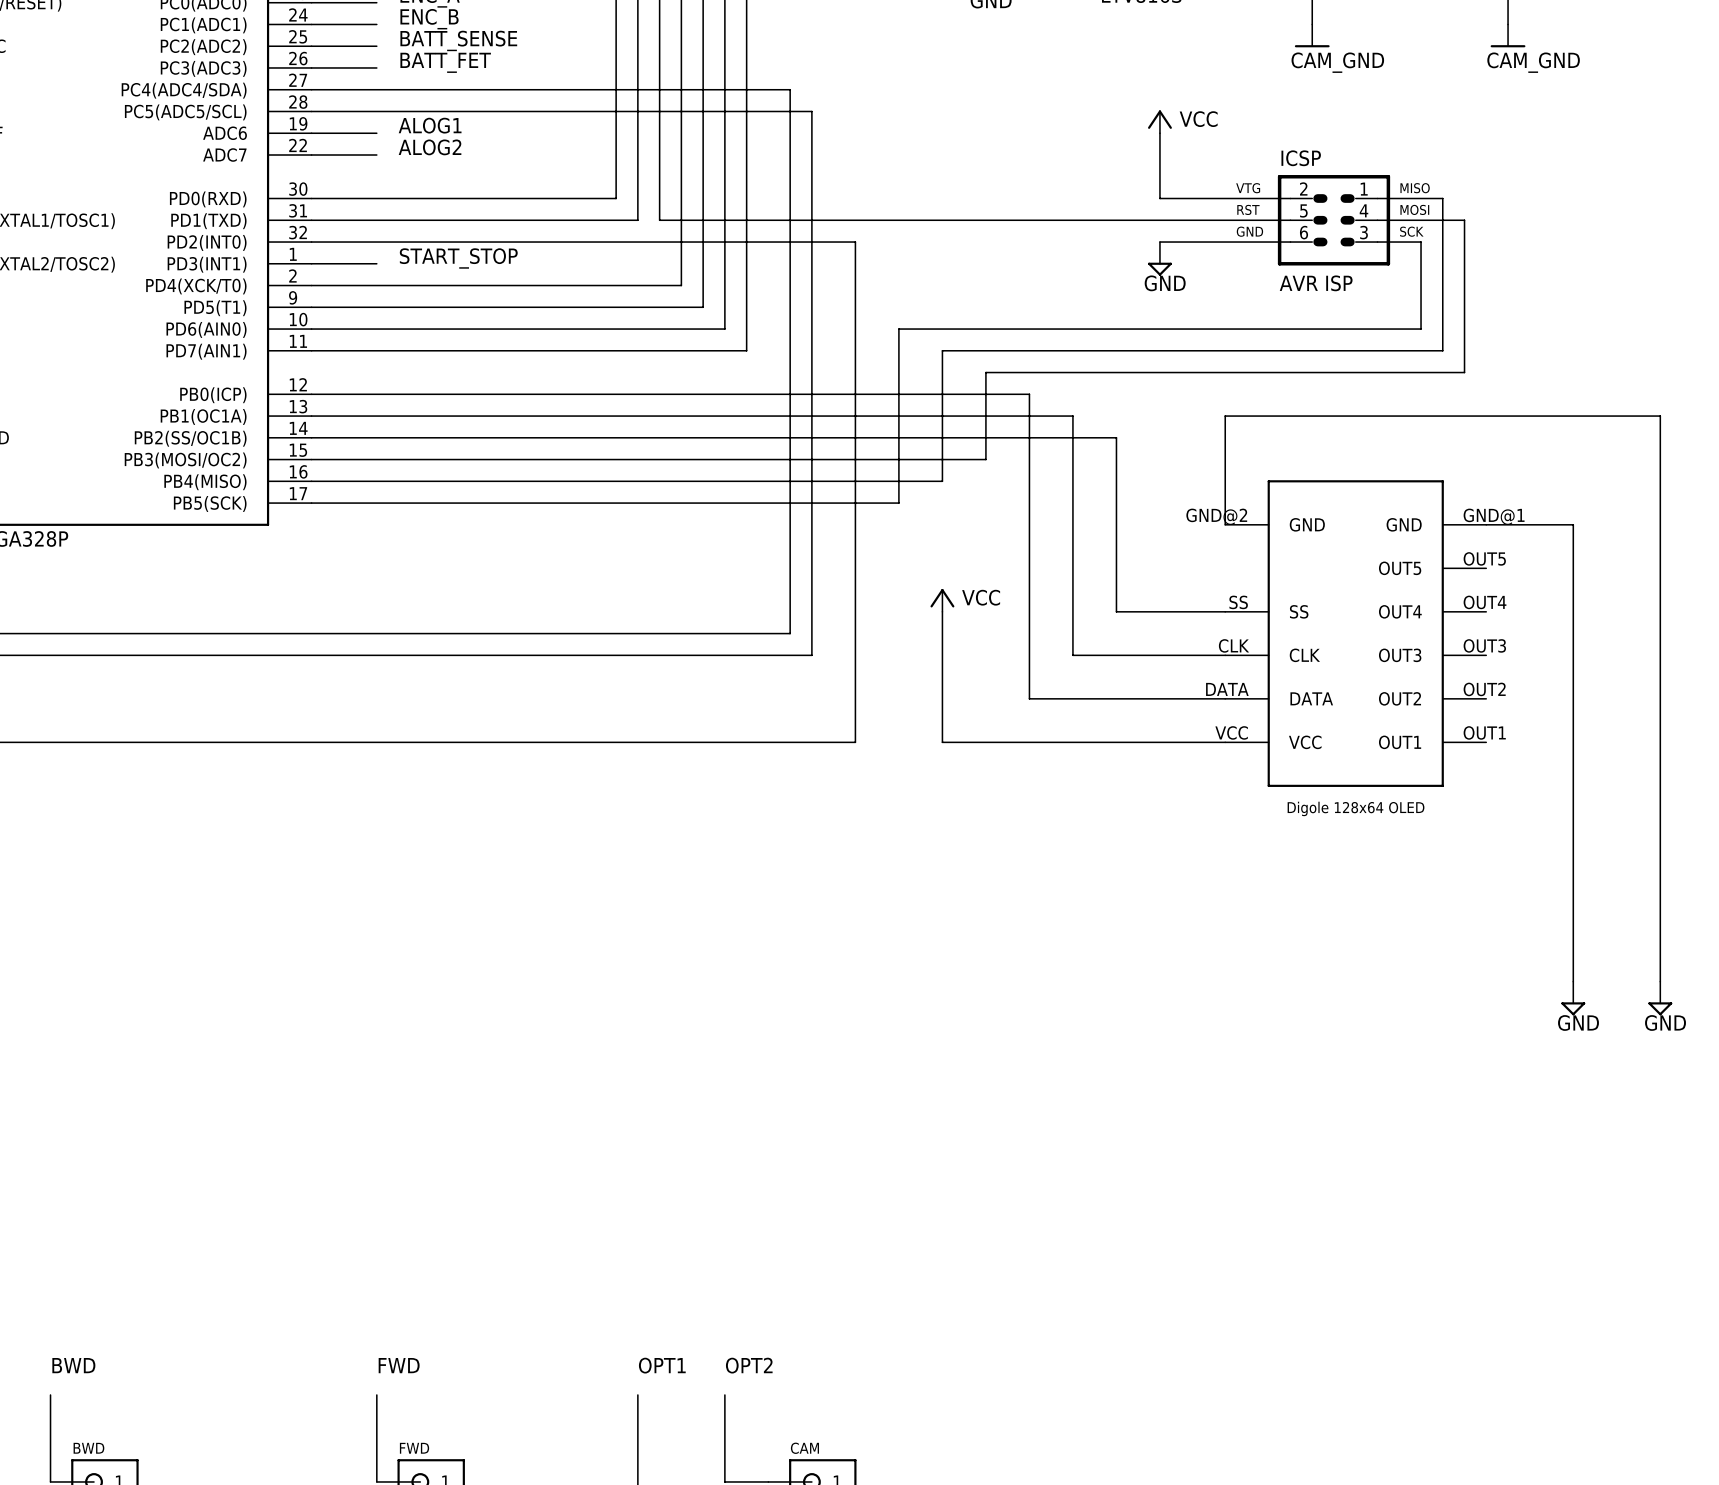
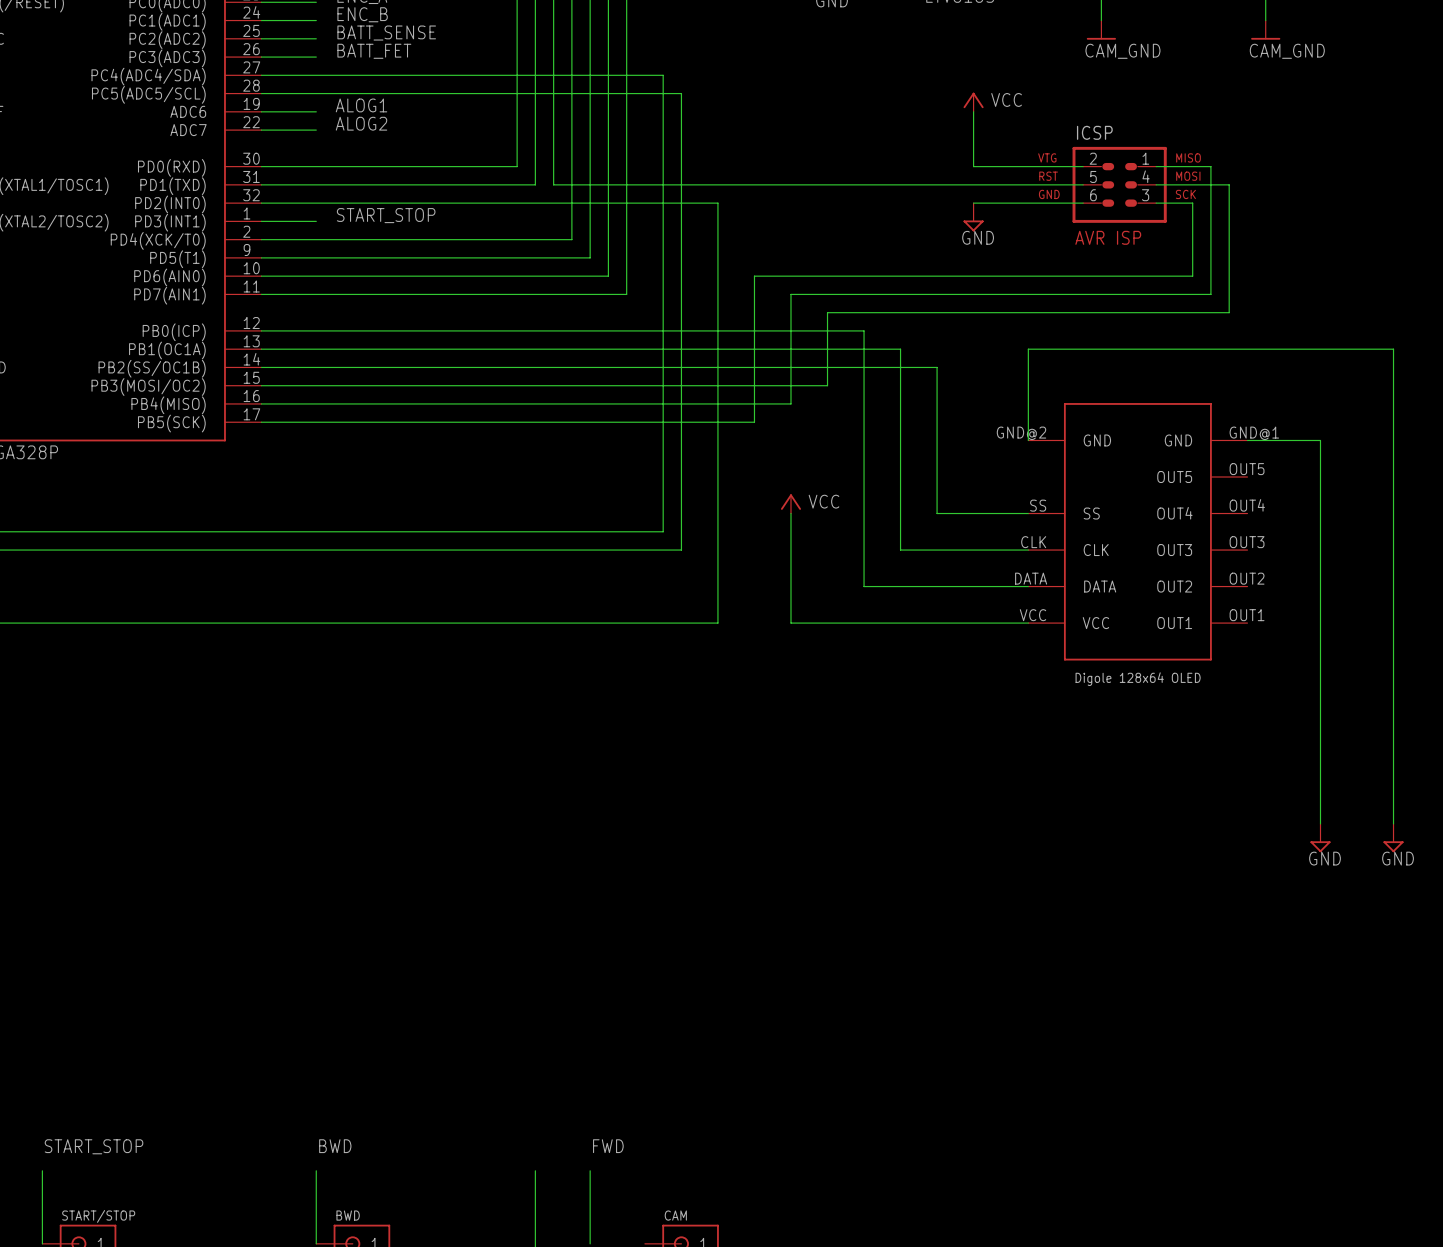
label: BWD (73, 1365) -> START_STOP (94, 1146)
label: FWD (399, 1365) -> BWD (335, 1146)
label: OPT1 (662, 1365) -> none
label: none -> FWD (608, 1146)
label: OPT2 (749, 1365) -> none
wire: none -> (590, 1170) (590, 1243)
wire: (724, 1394) (724, 1481) (768, 1481) -> none
BWD name: BWD (88, 1448) -> START/STOP (98, 1216)
FWD name: FWD (414, 1448) -> BWD (348, 1215)

